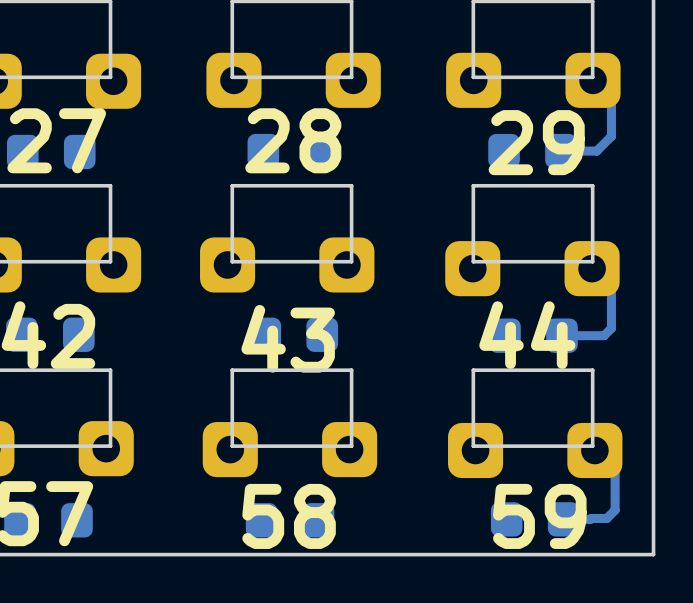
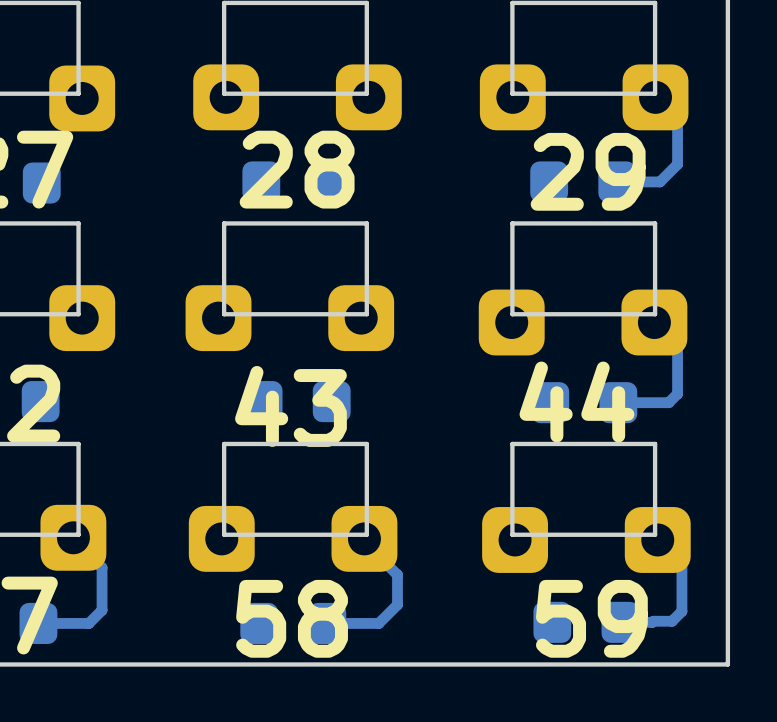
bottom track: none -> (73, 550) (85, 550) (102, 567) (102, 610) (88, 623) (38, 623)
bottom track: none -> (364, 550) (373, 550) (397, 574) (397, 604) (378, 623) (327, 623)

